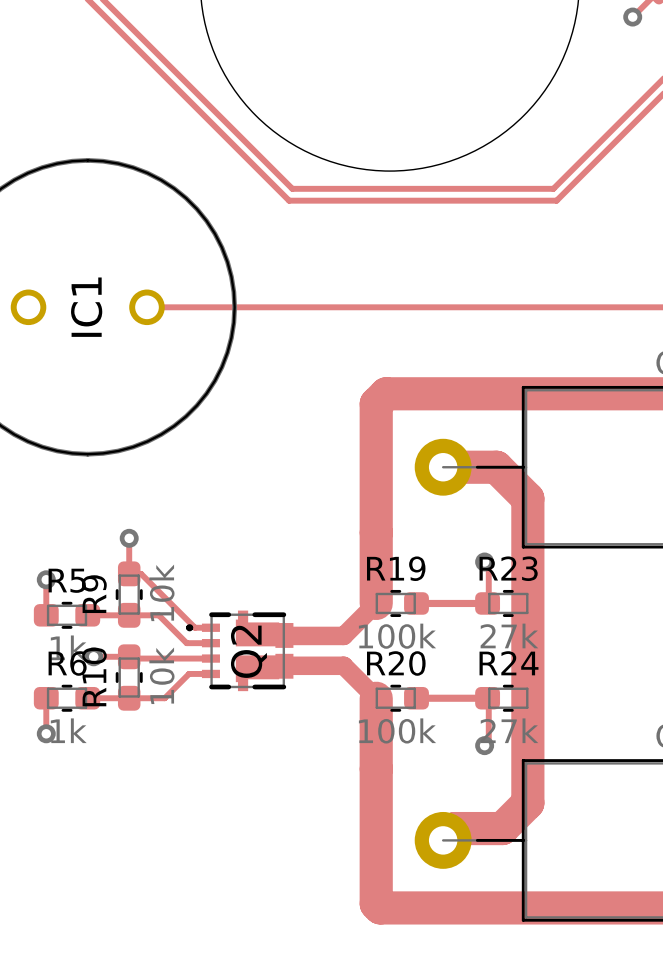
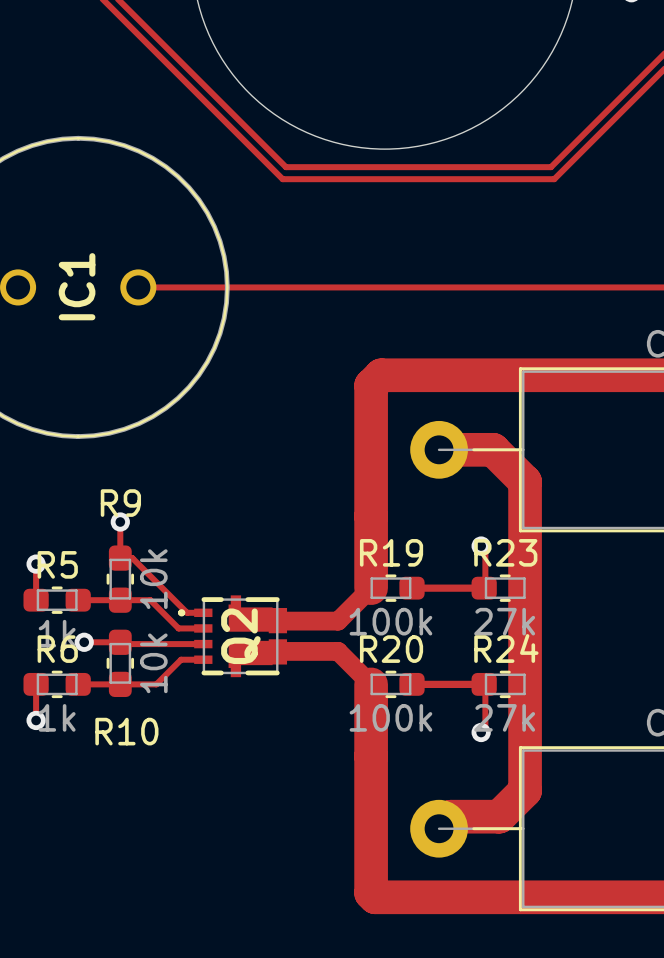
R9 name rotation: 0° (94, 594) -> 90° clockwise (120, 503)
R9 name position: R9 (94, 594) -> R9 (120, 503)
R10 name rotation: 0° (94, 677) -> 90° clockwise (126, 731)

